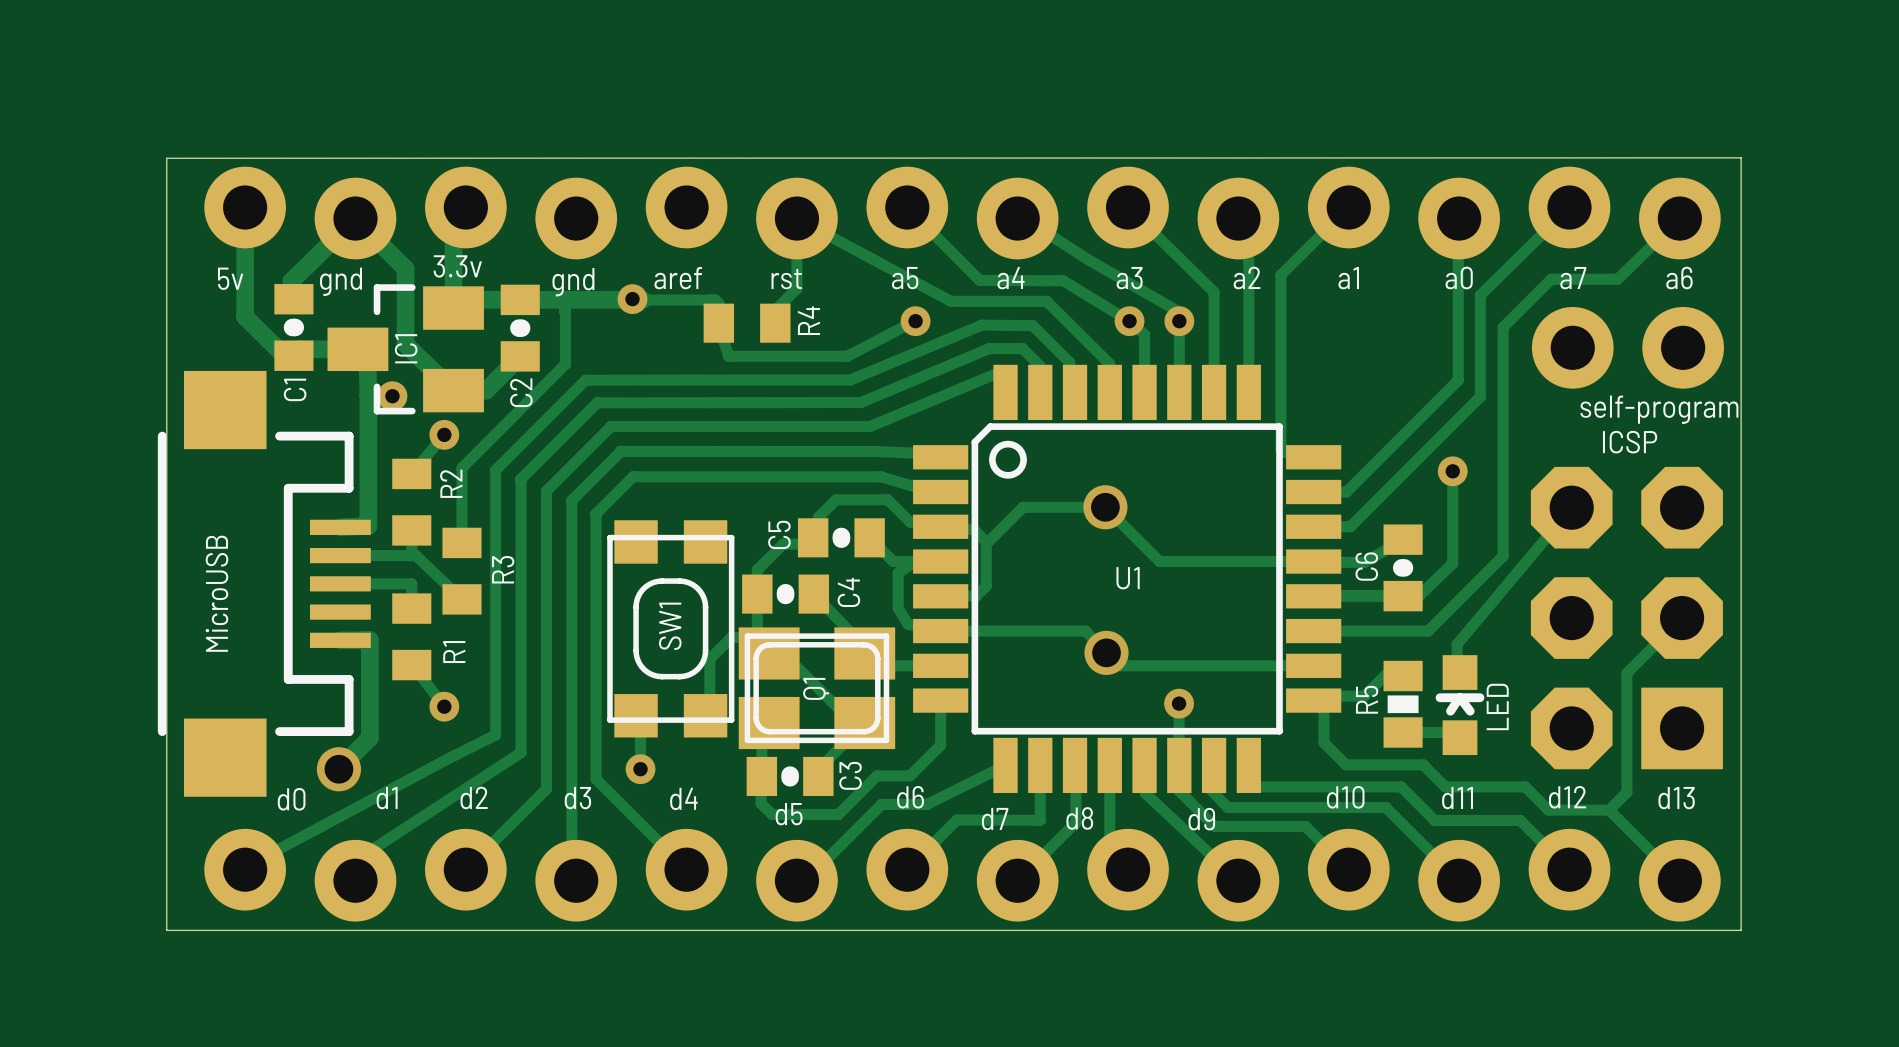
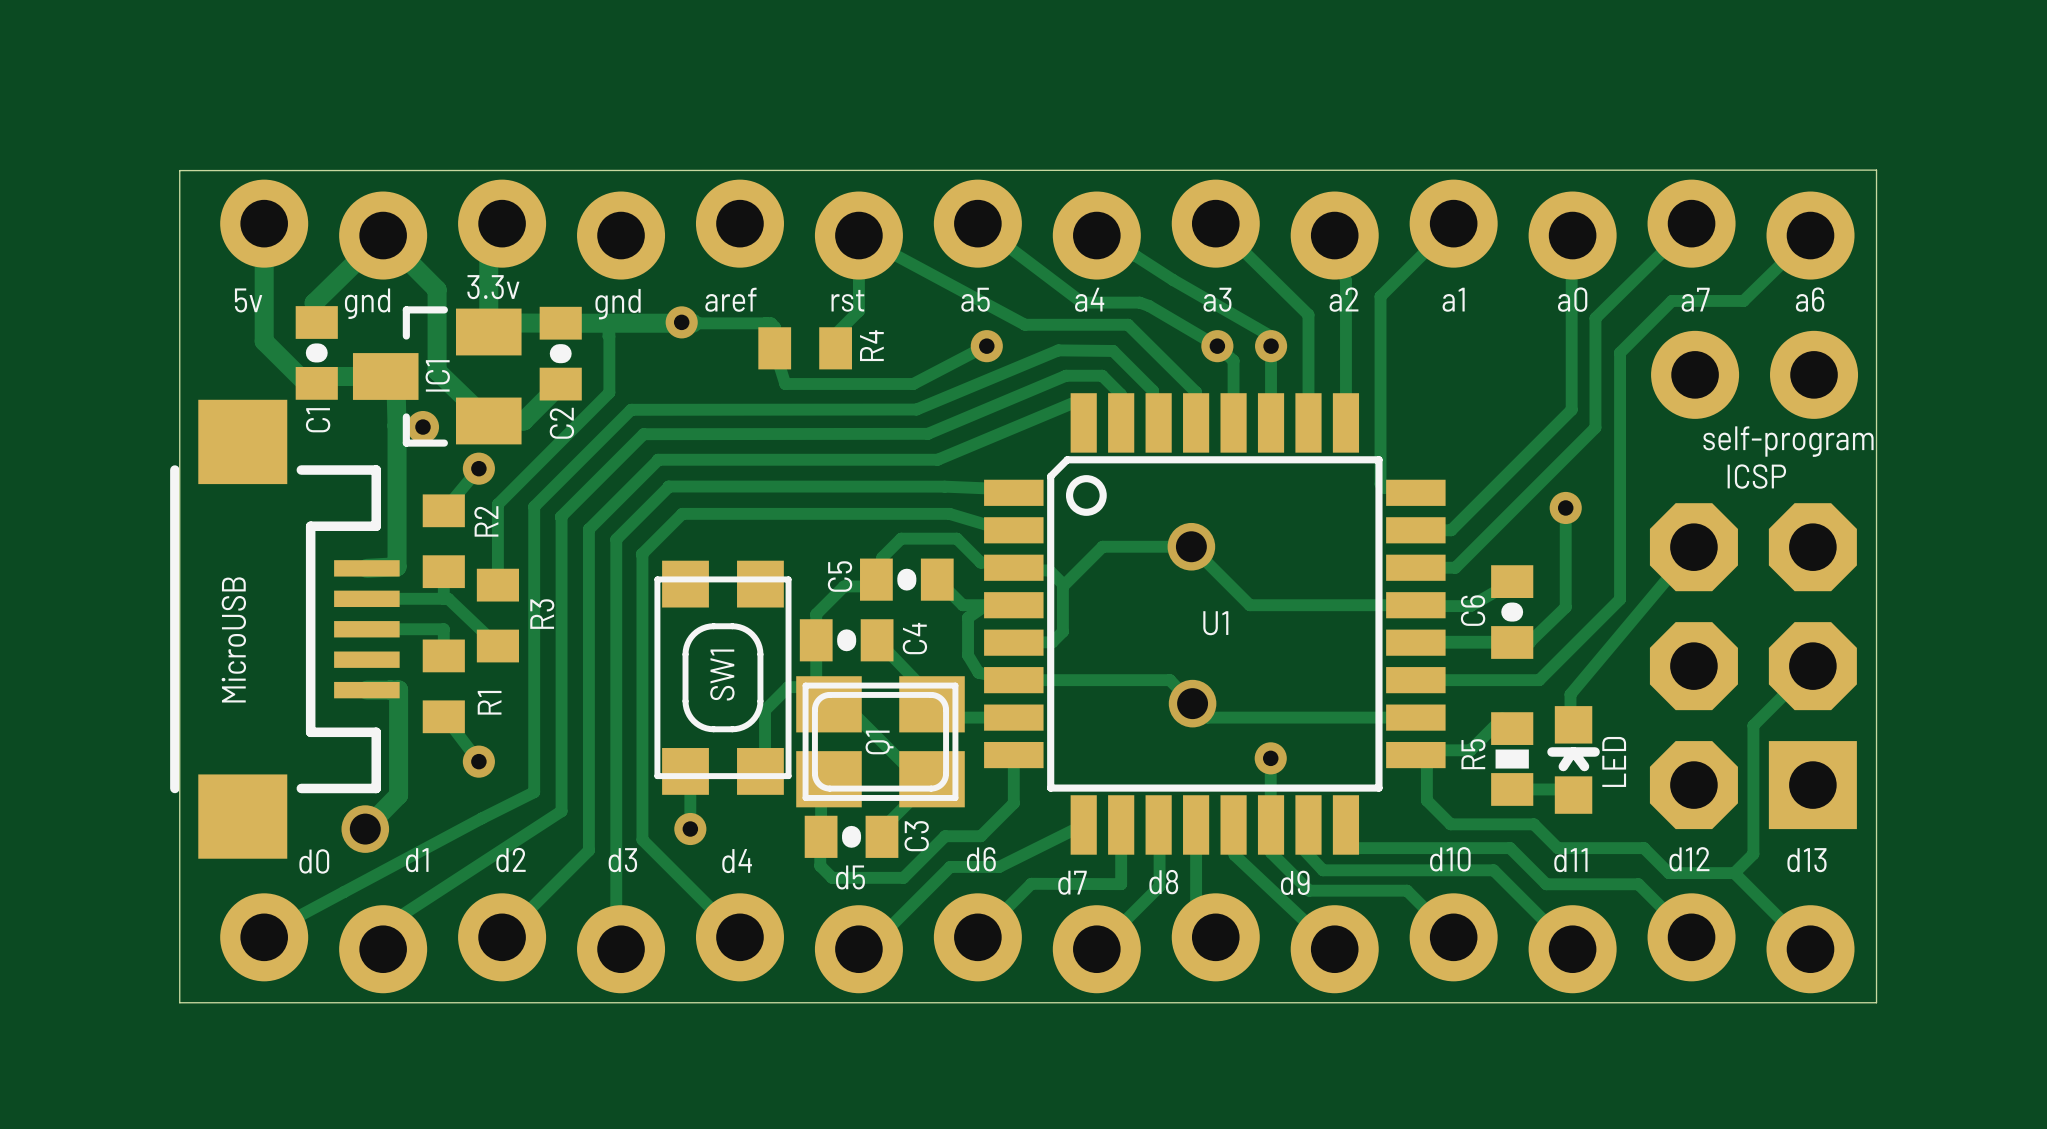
track: (907, 207) (979, 280) (1062, 280) (1129, 321) -> (977, 223) (1082, 302) (1139, 302) (1149, 305) (1217, 346)

